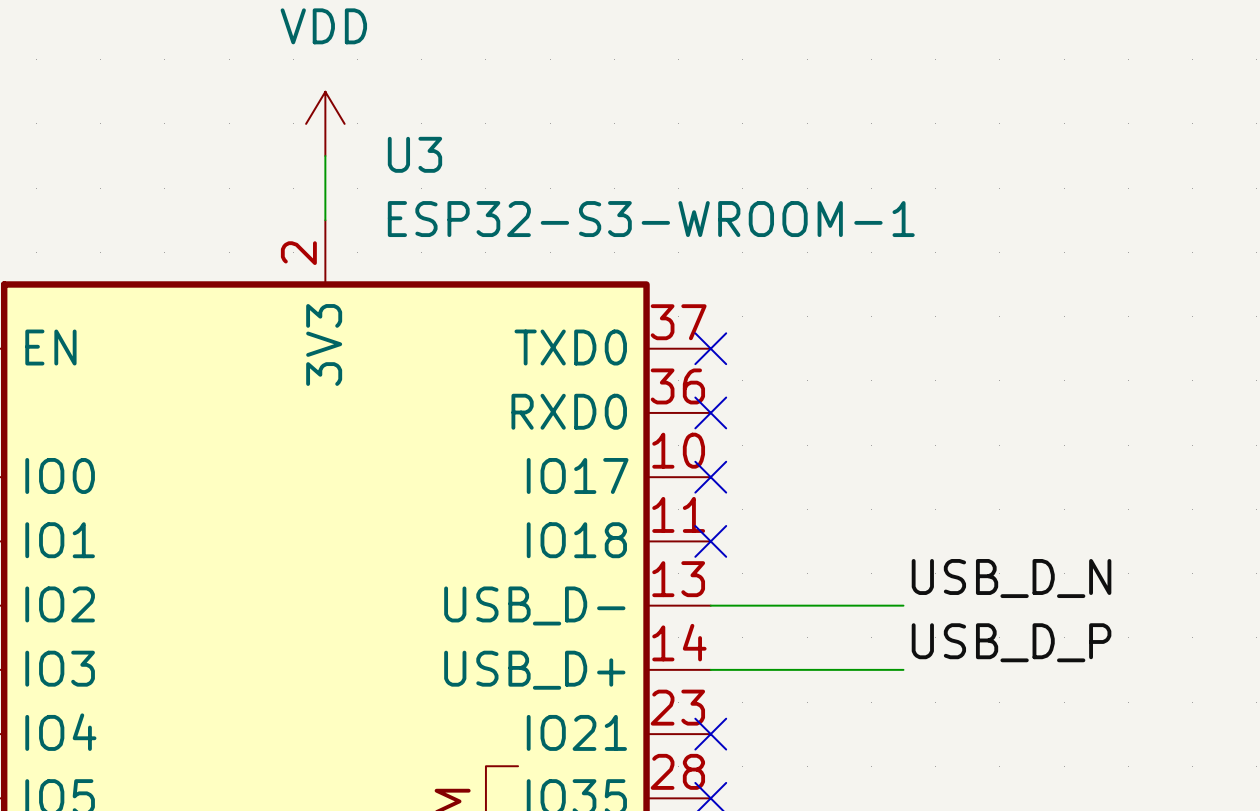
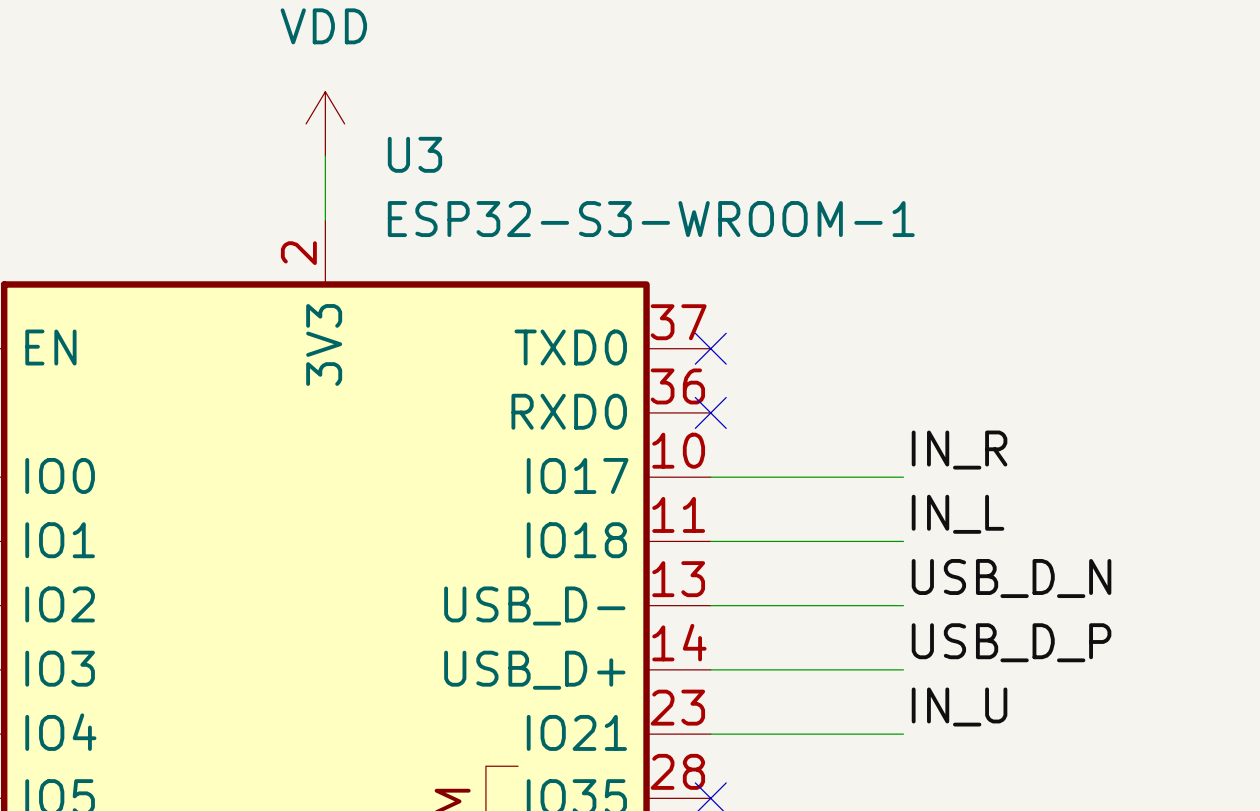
label: none -> IN_R (959, 450)
wire: none -> (710, 477) (903, 477)
no-connect mark: (710, 477) -> none
label: none -> IN_L (958, 514)
wire: none -> (710, 541) (903, 541)
no-connect mark: (710, 541) -> none
label: none -> IN_U (959, 706)
wire: none -> (710, 734) (903, 734)
no-connect mark: (710, 734) -> none

